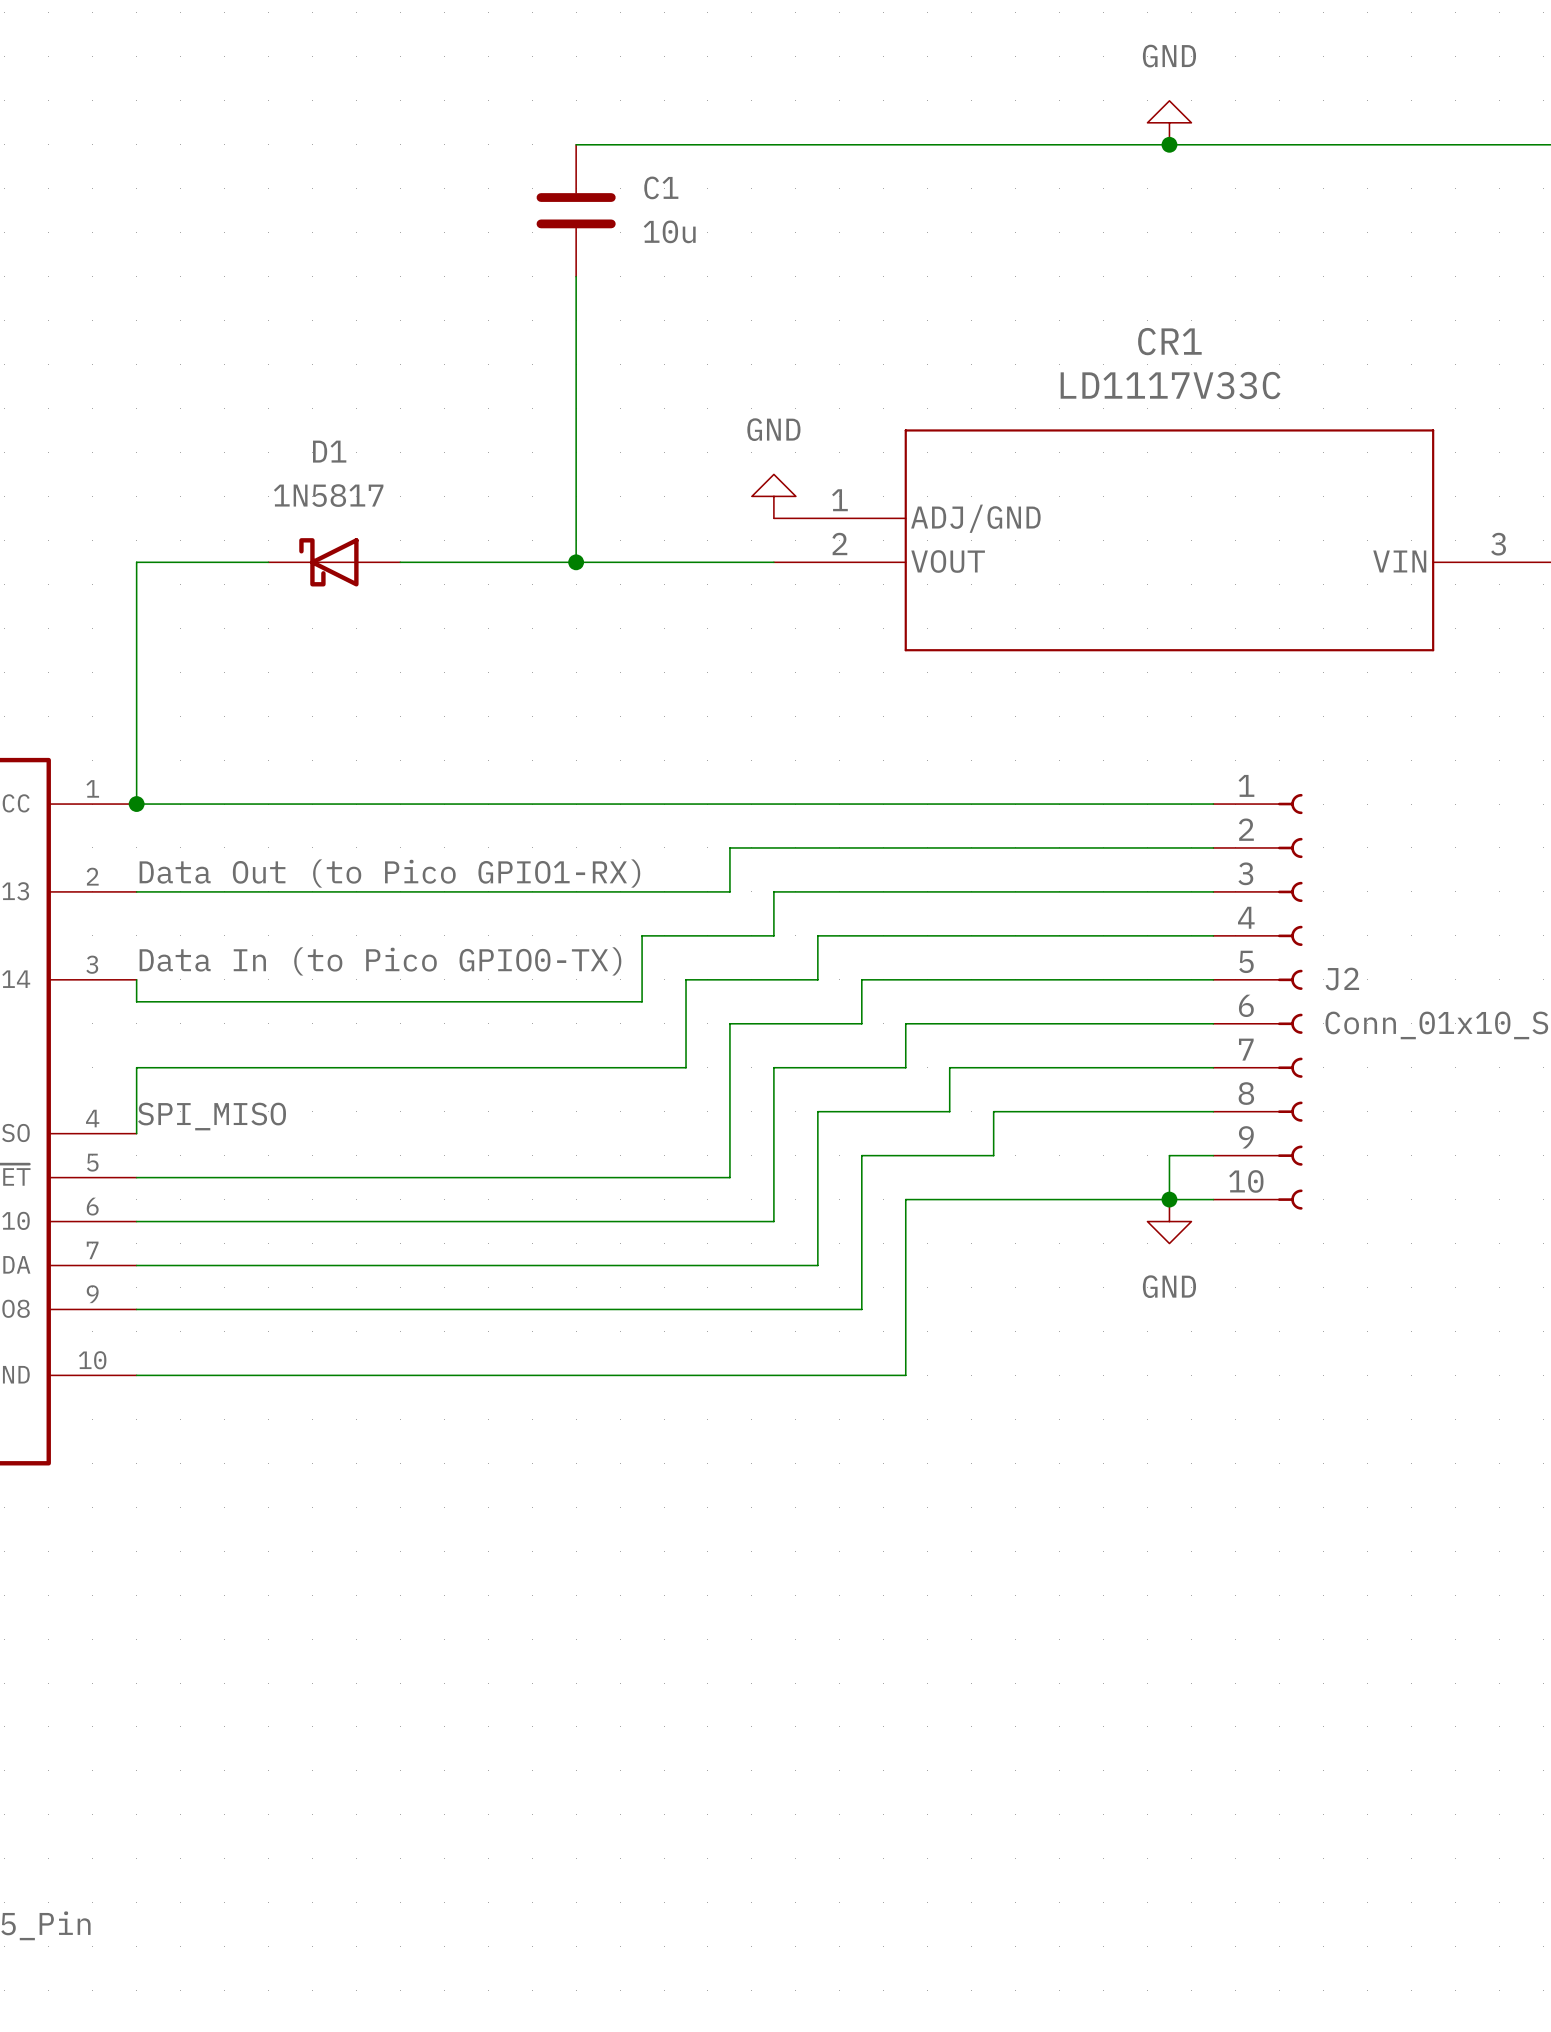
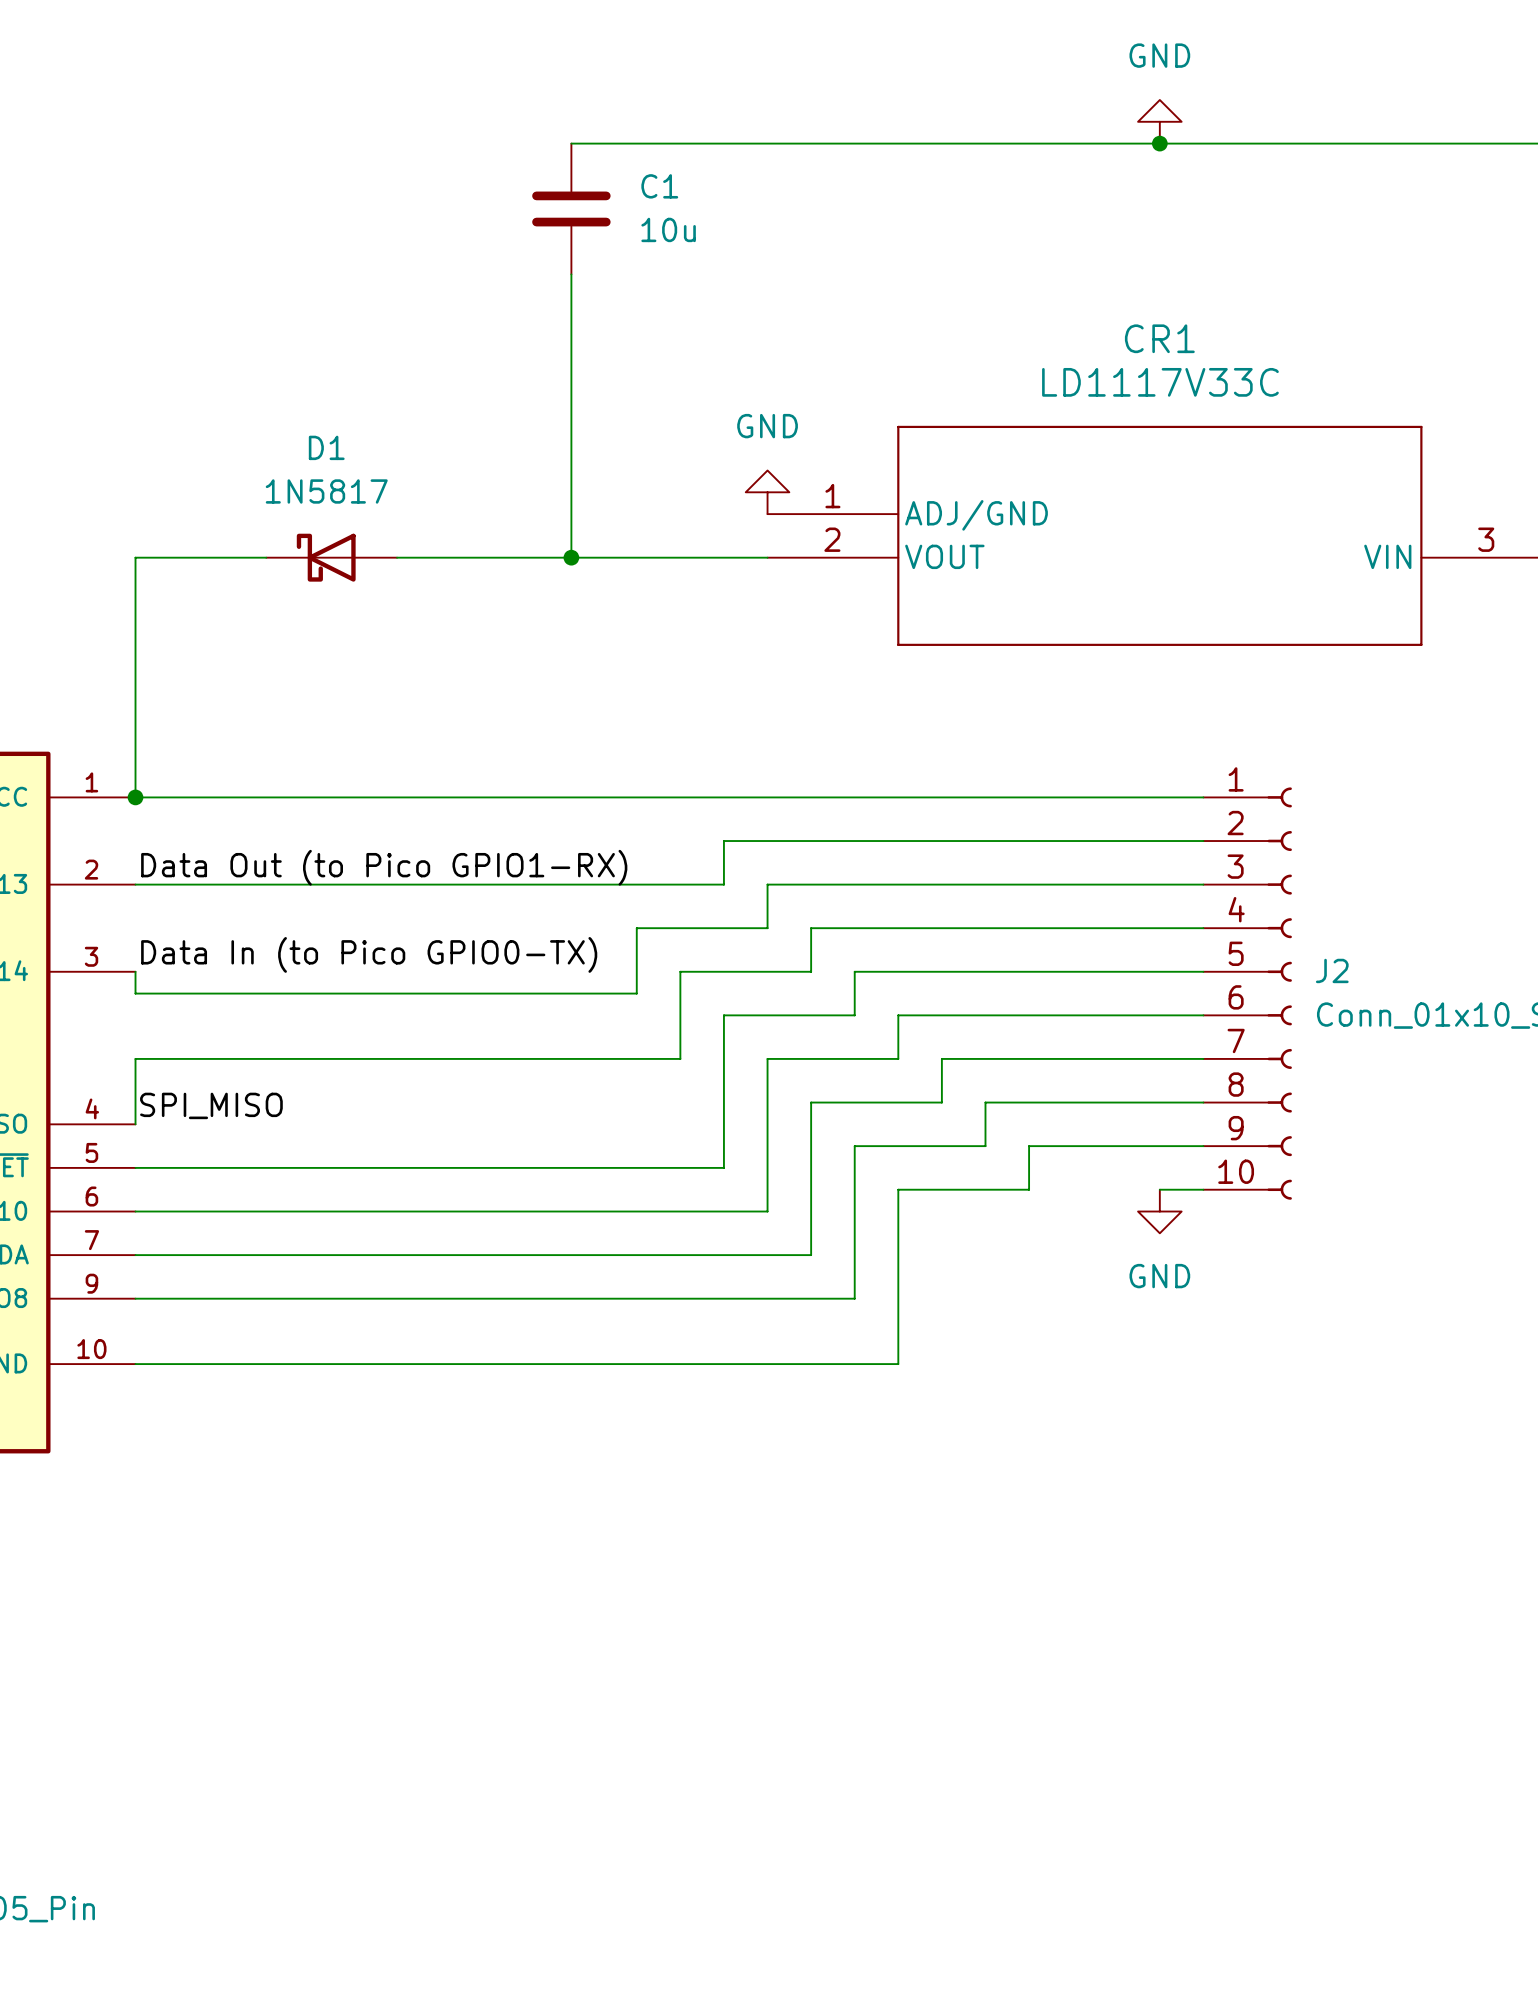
wire: (1169, 1155) (1169, 1199) (1037, 1199) -> (1159, 1146) (1029, 1146) (1029, 1189)
junction: (1169, 1199) -> none

